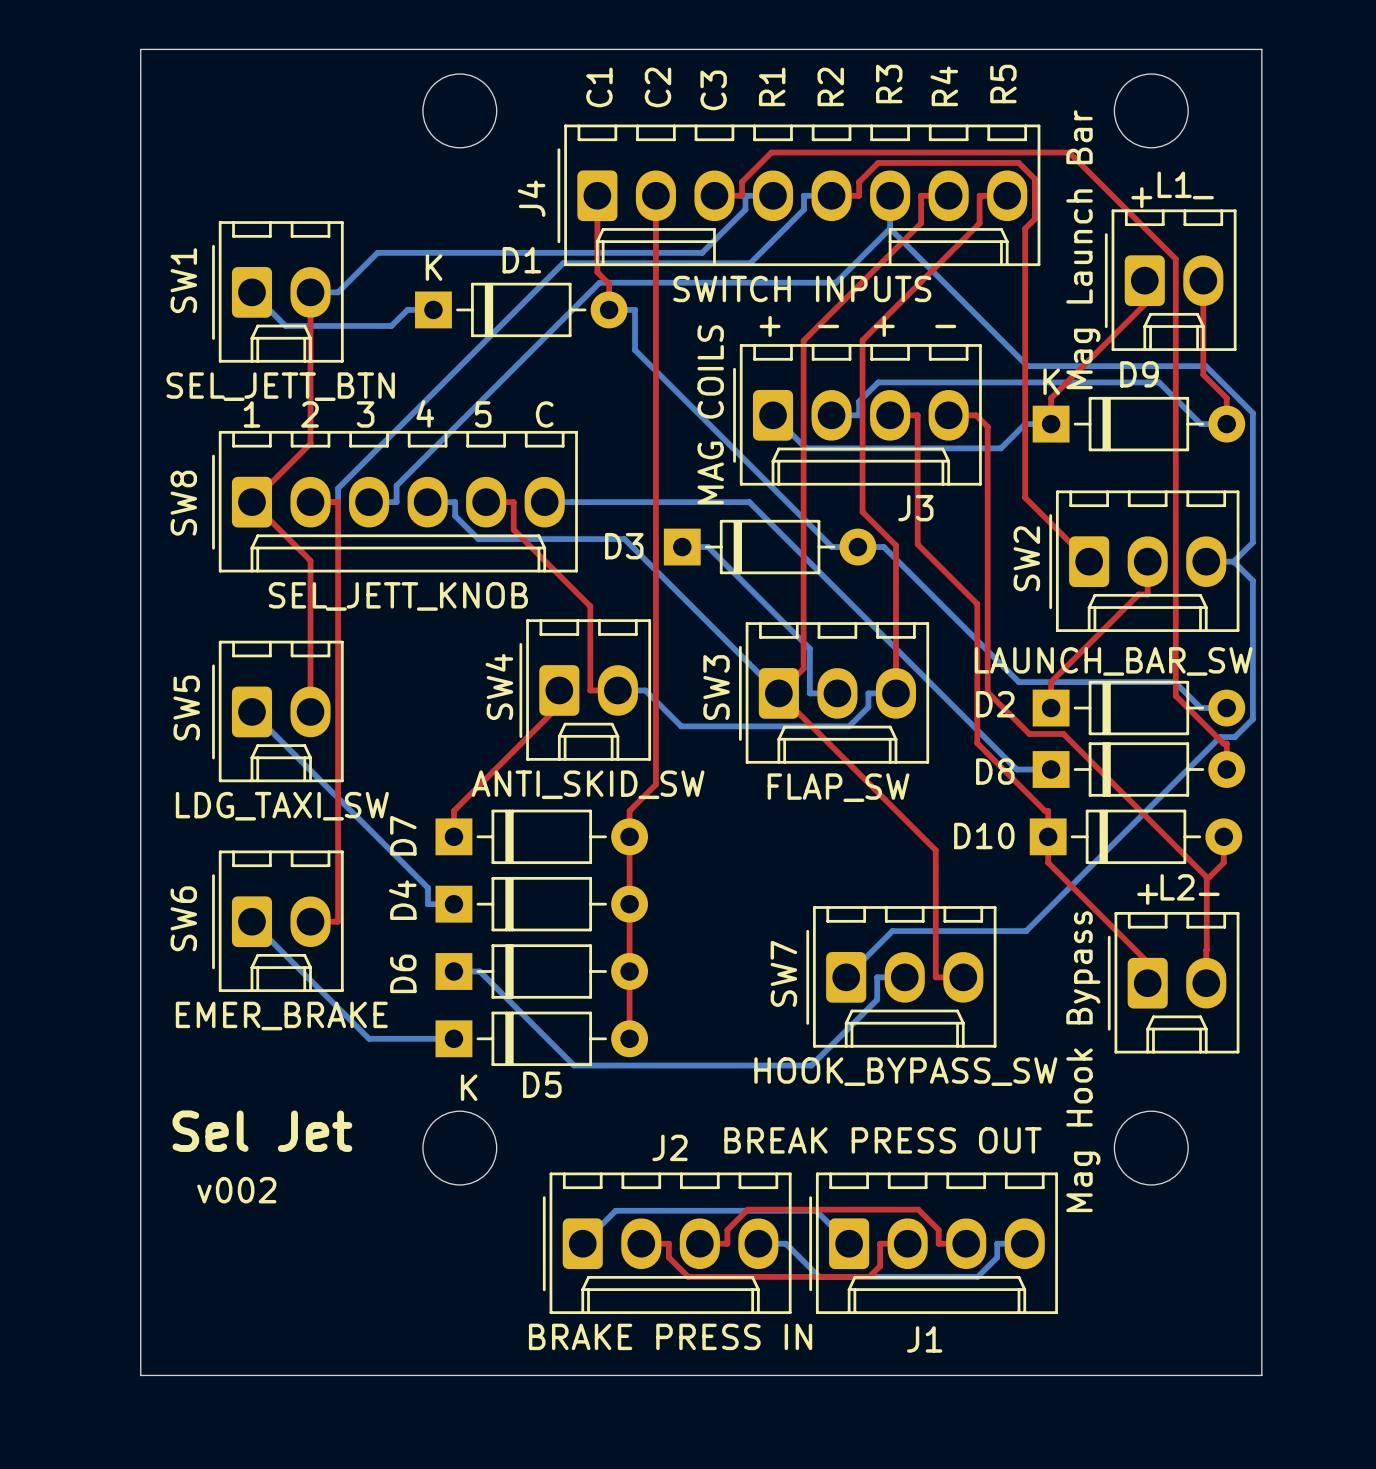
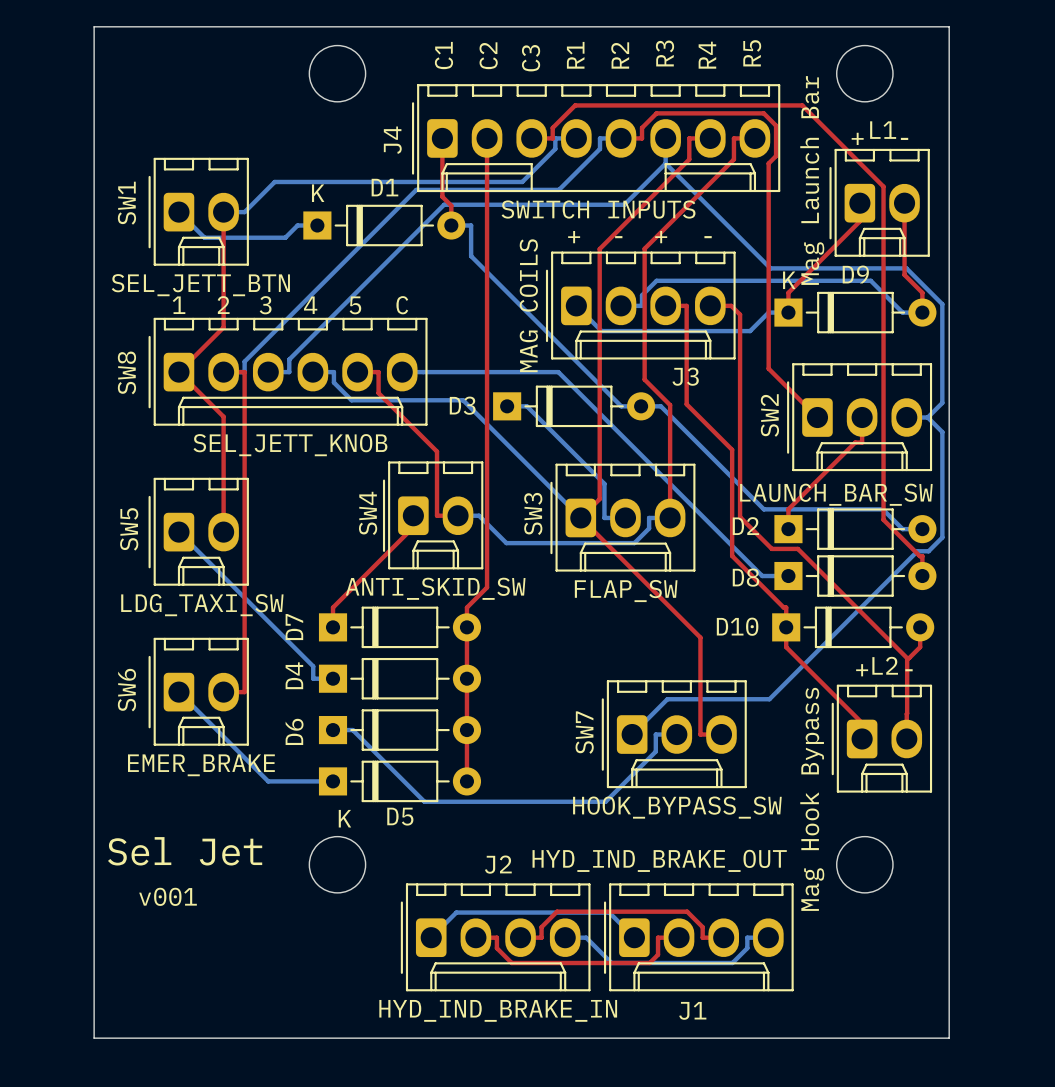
J1 value: BREAK PRESS OUT (882, 1140) -> HYD_IND_BRAKE_OUT (659, 860)
text: v002 (236, 1190) -> v001 (168, 896)
J2 value: BRAKE PRESS IN (670, 1336) -> HYD_IND_BRAKE_IN (498, 1010)

